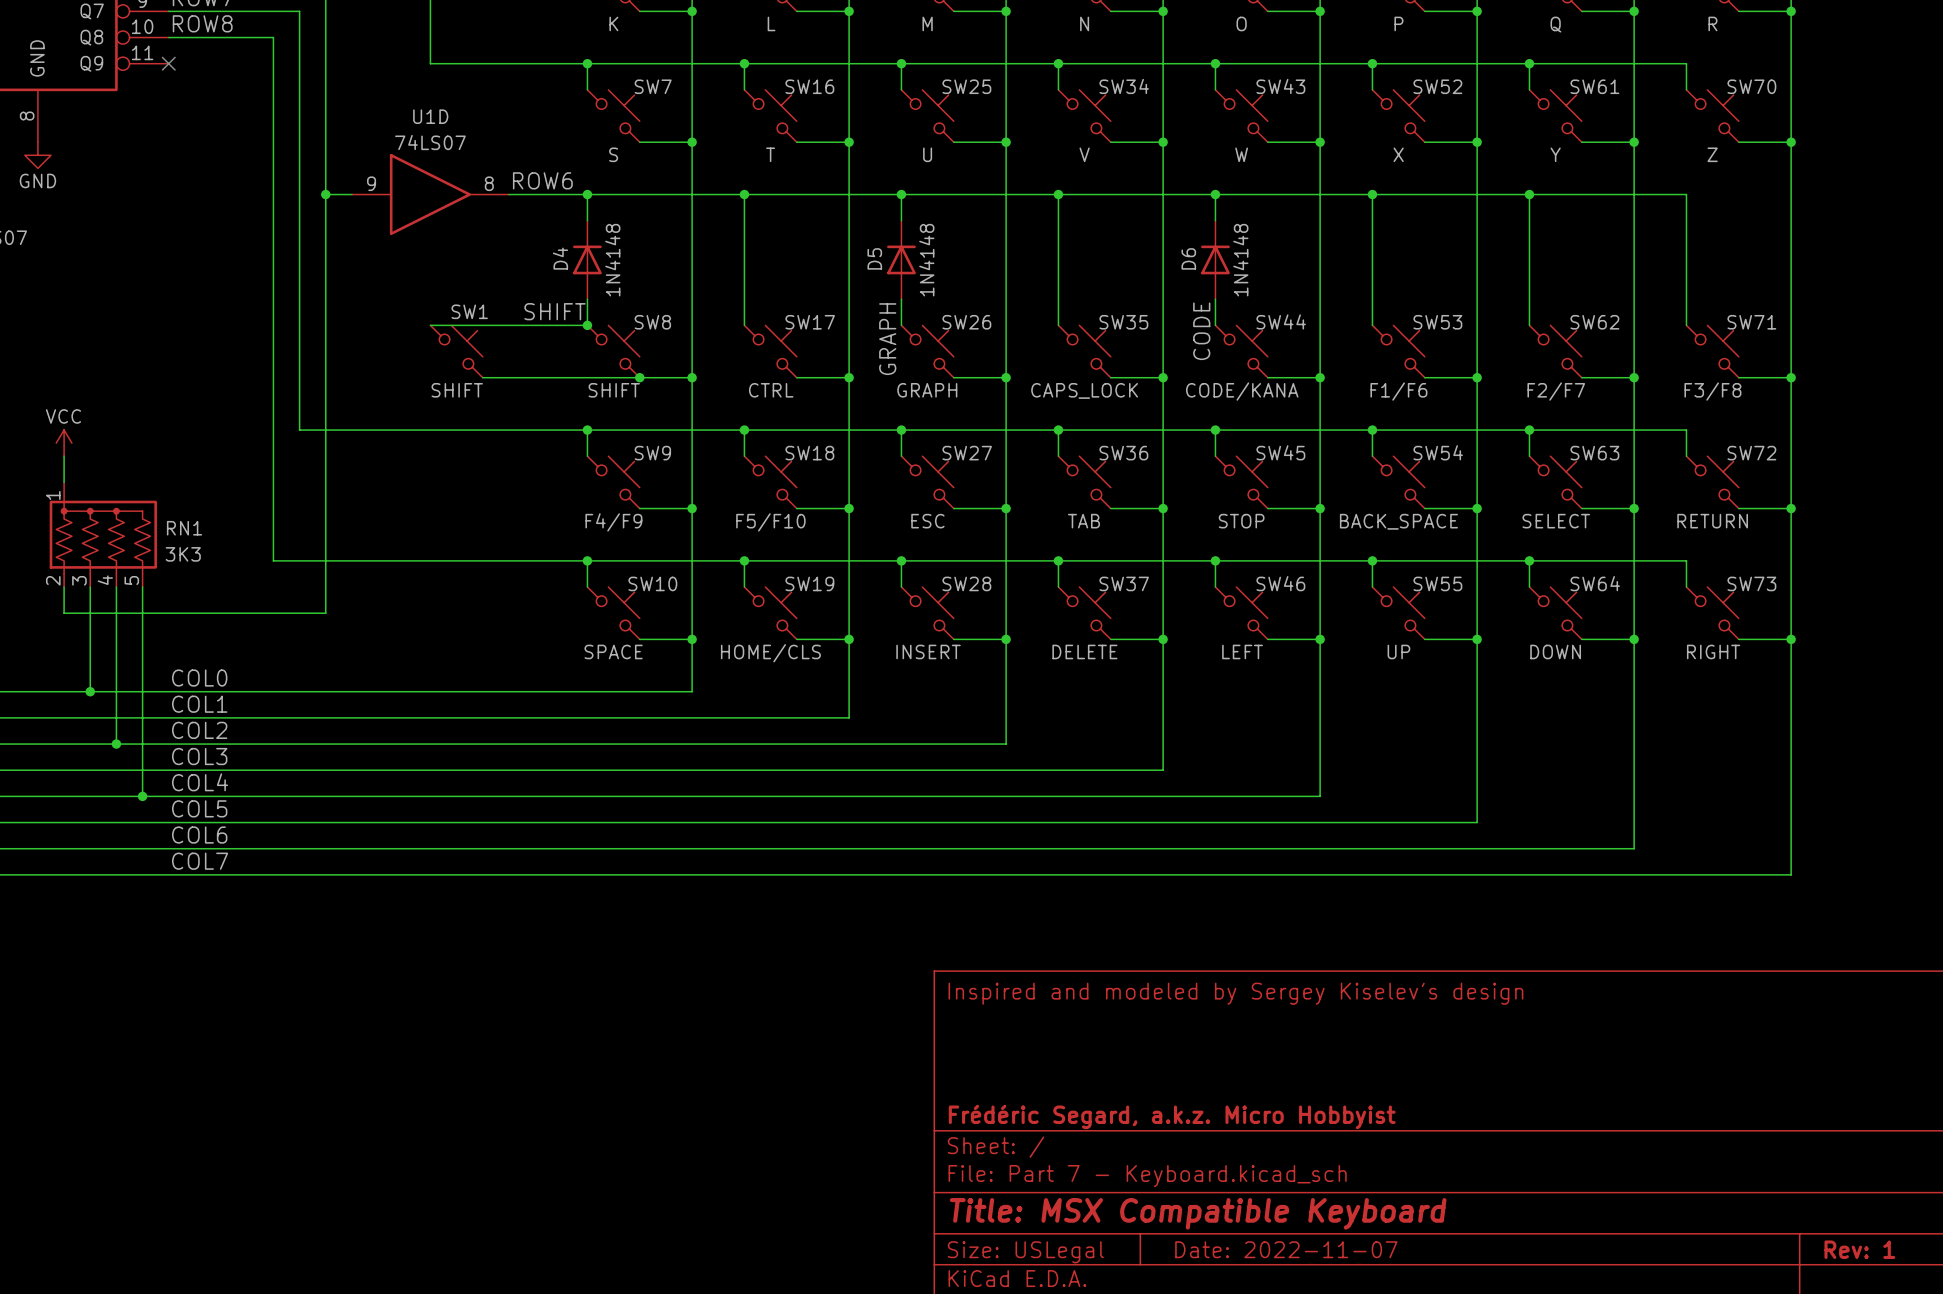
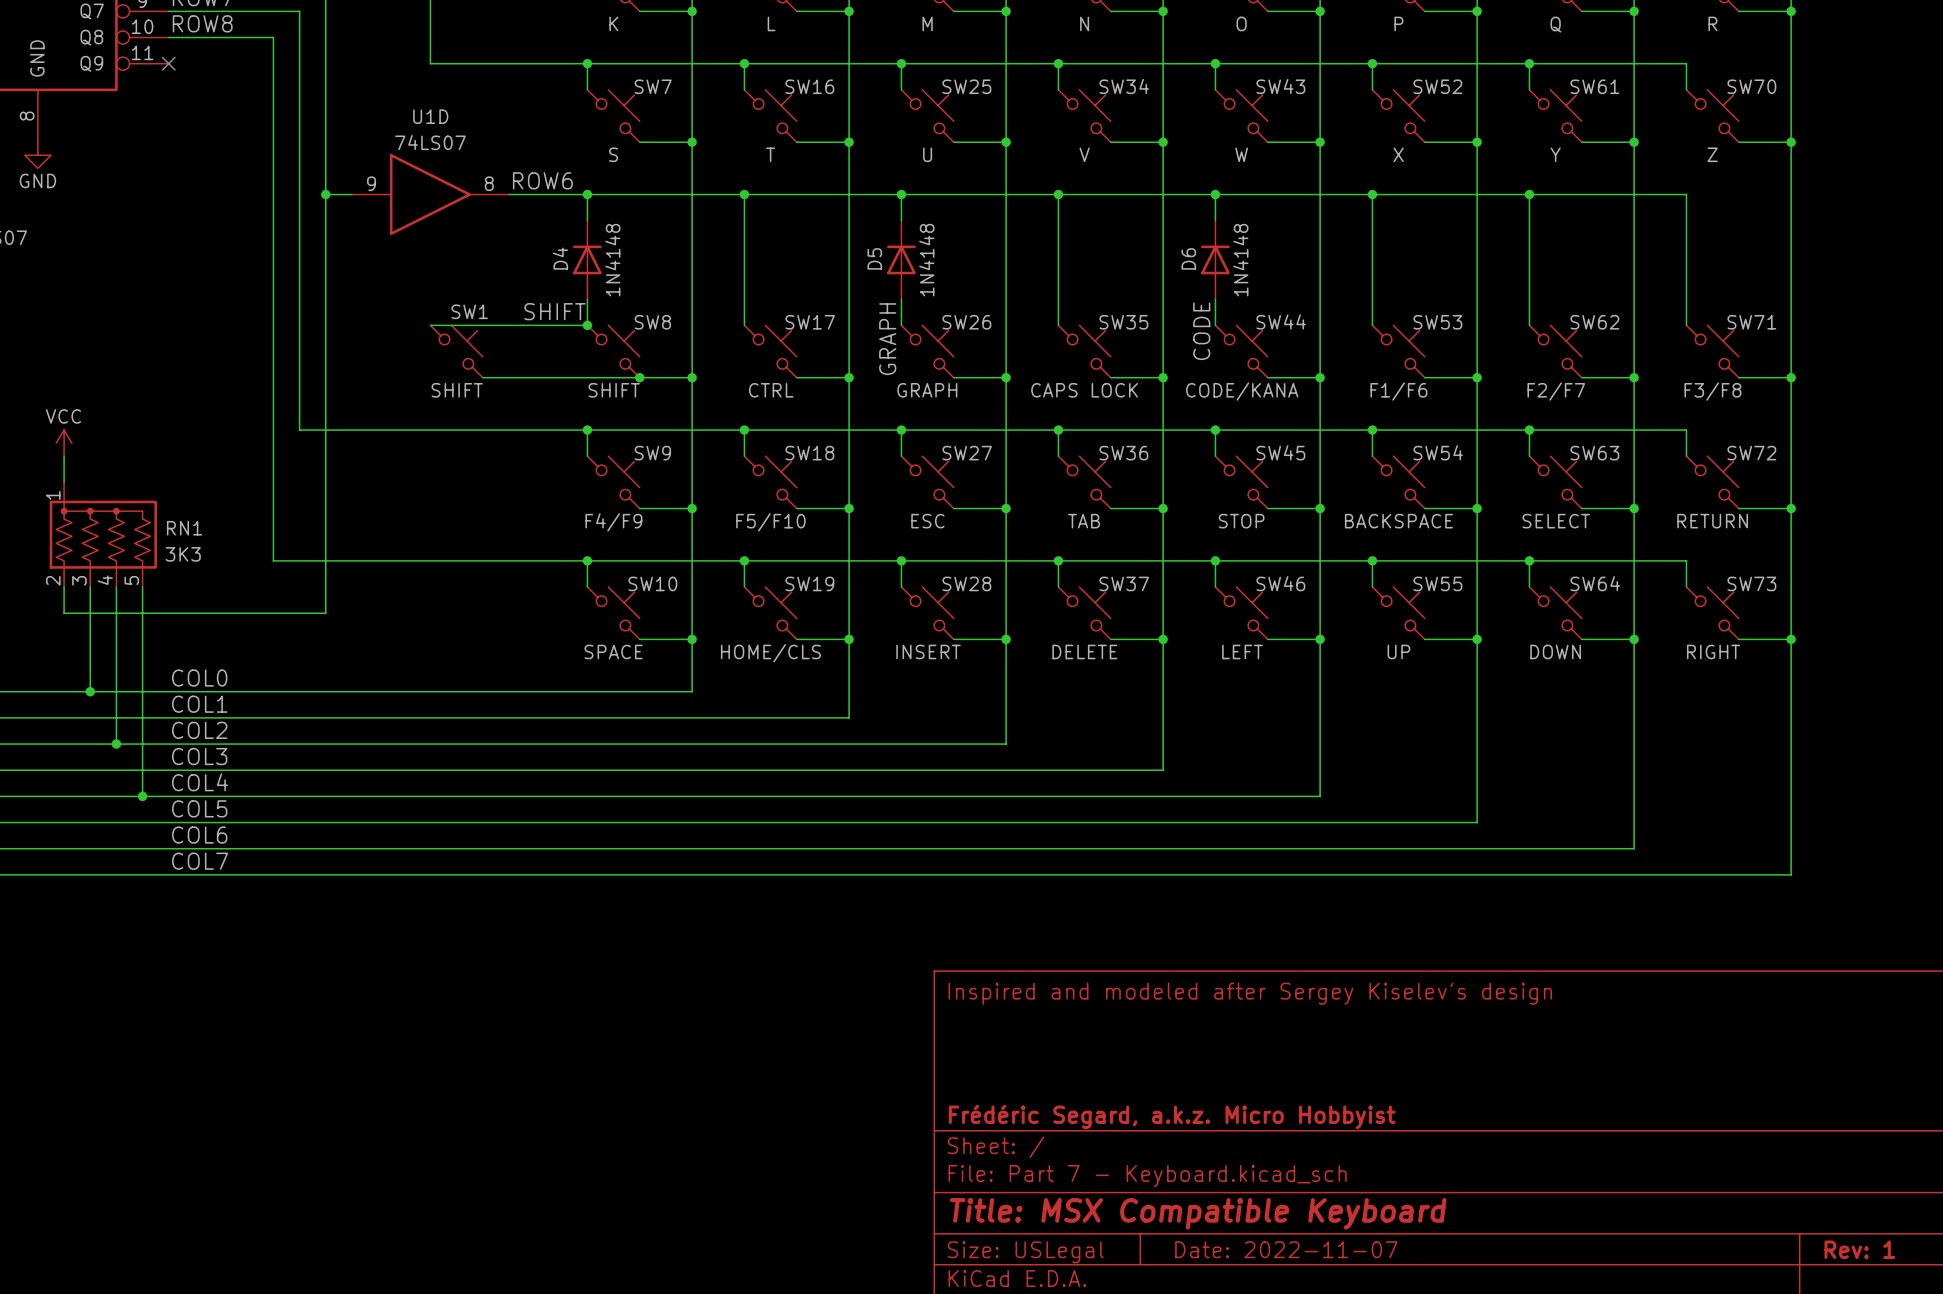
SW35 value: CAPS_LOCK (1084, 390) -> CAPS LOCK (1084, 390)
SW54 value: BACK_SPACE (1398, 521) -> BACKSPACE (1398, 521)
title block: Inspired and modeled by Sergey Kiselev's design (1235, 993) -> Inspired and modeled after Sergey Kiselev's design (1250, 993)

